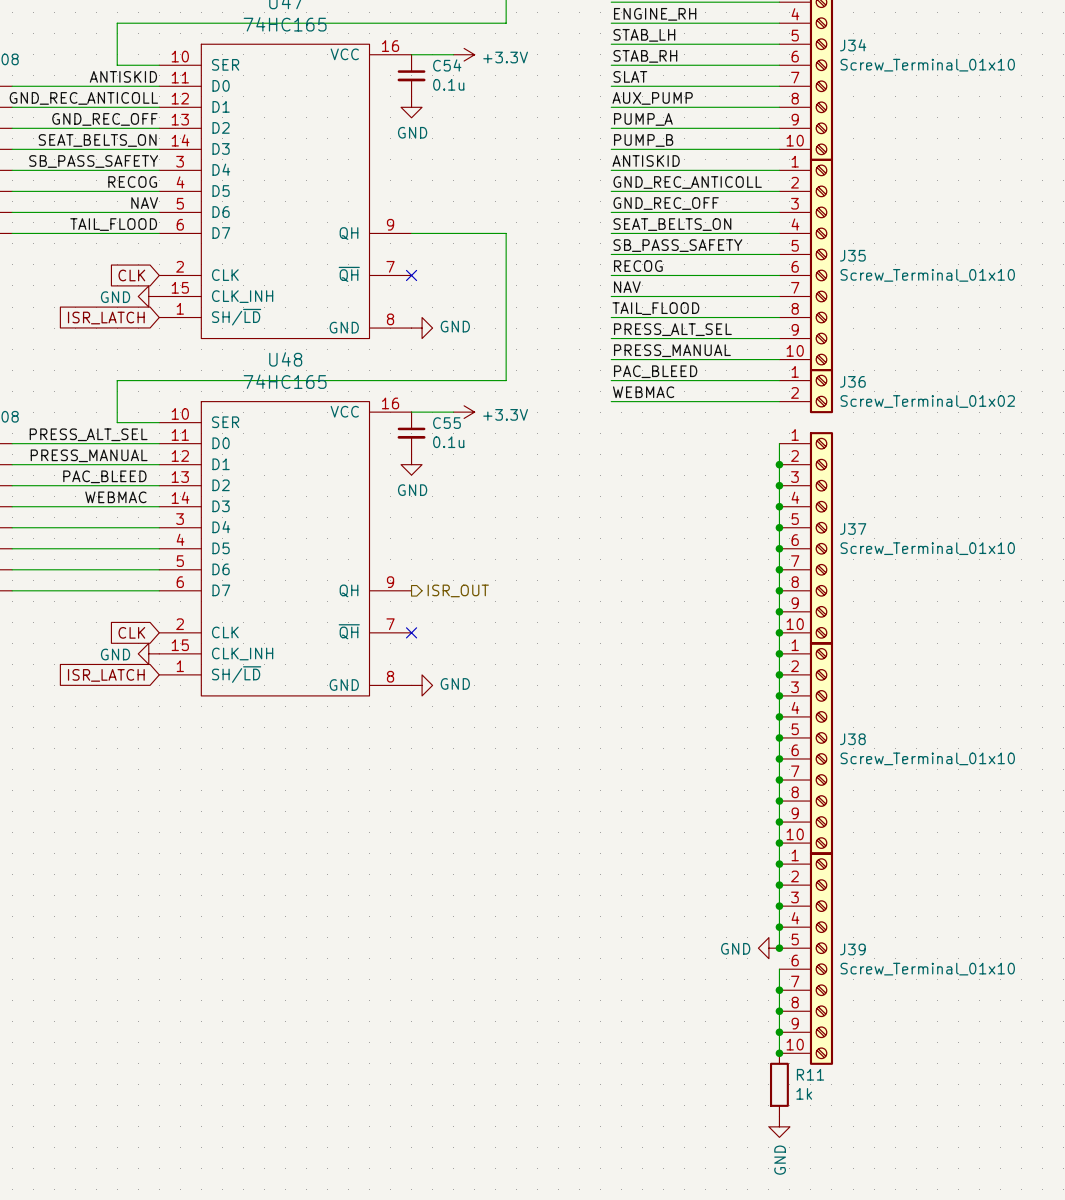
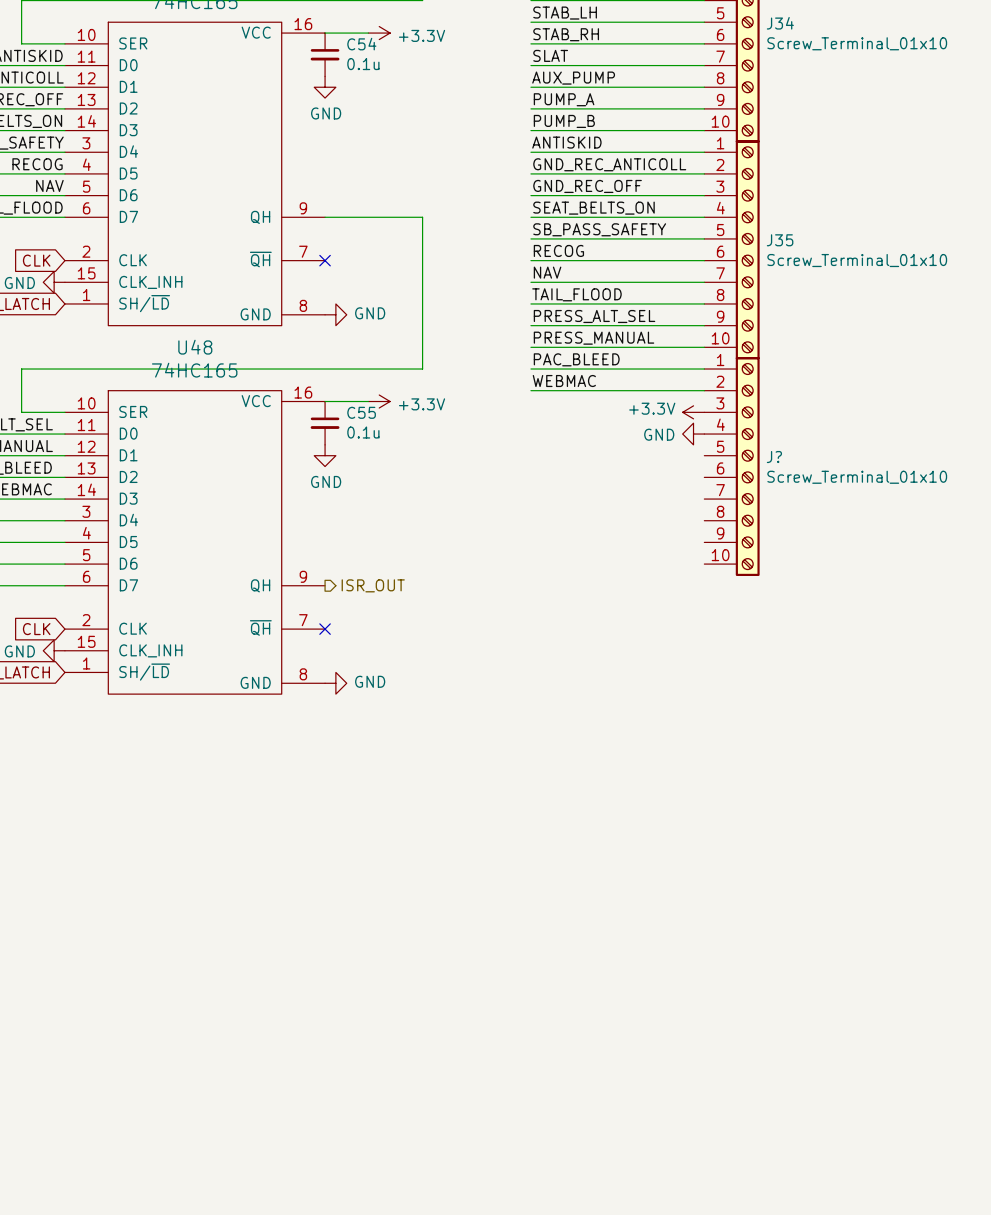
J36: Screw_Terminal_01x02 (806, 391) -> none
power symbol: none -> +3.3V (693, 412)
power symbol: none -> GND (693, 434)
wire: (779, 443) (779, 948) -> none
junction: (779, 464) -> none
J?: none -> Screw_Terminal_01x10 (731, 466)
junction: (779, 485) -> none
junction: (779, 506) -> none
junction: (779, 527) -> none
J37: Screw_Terminal_01x10 (806, 538) -> none
junction: (779, 548) -> none
junction: (779, 569) -> none
junction: (779, 590) -> none
junction: (779, 611) -> none
junction: (779, 632) -> none
junction: (779, 653) -> none
junction: (779, 674) -> none
junction: (779, 695) -> none
junction: (779, 716) -> none
junction: (779, 737) -> none
J38: Screw_Terminal_01x10 (806, 748) -> none
junction: (779, 758) -> none
junction: (779, 780) -> none
junction: (779, 801) -> none
junction: (779, 822) -> none
junction: (779, 843) -> none
junction: (779, 864) -> none
junction: (779, 885) -> none
junction: (779, 906) -> none
junction: (779, 927) -> none
power symbol: GND (768, 948) -> none
junction: (779, 948) -> none
J39: Screw_Terminal_01x10 (806, 958) -> none
wire: (779, 969) (779, 1053) -> none
junction: (779, 990) -> none
junction: (779, 1011) -> none
junction: (779, 1032) -> none
junction: (779, 1053) -> none
R11: 1k (779, 1084) -> none
power symbol: GND (779, 1126) -> none

